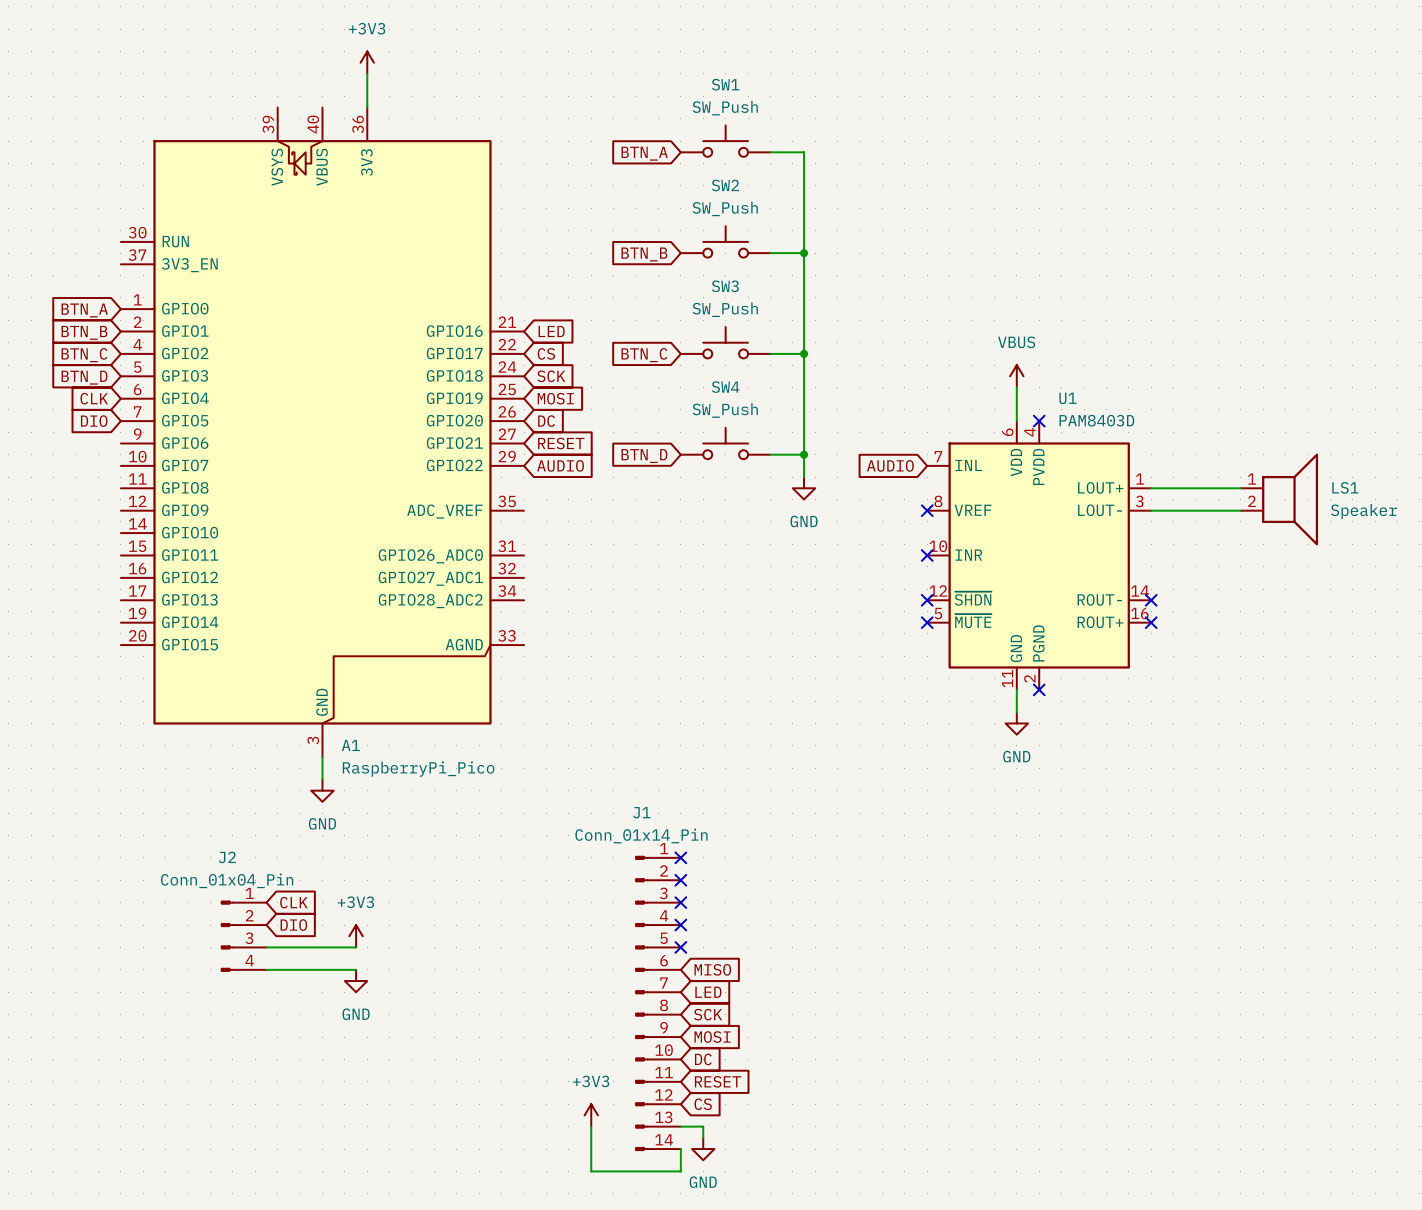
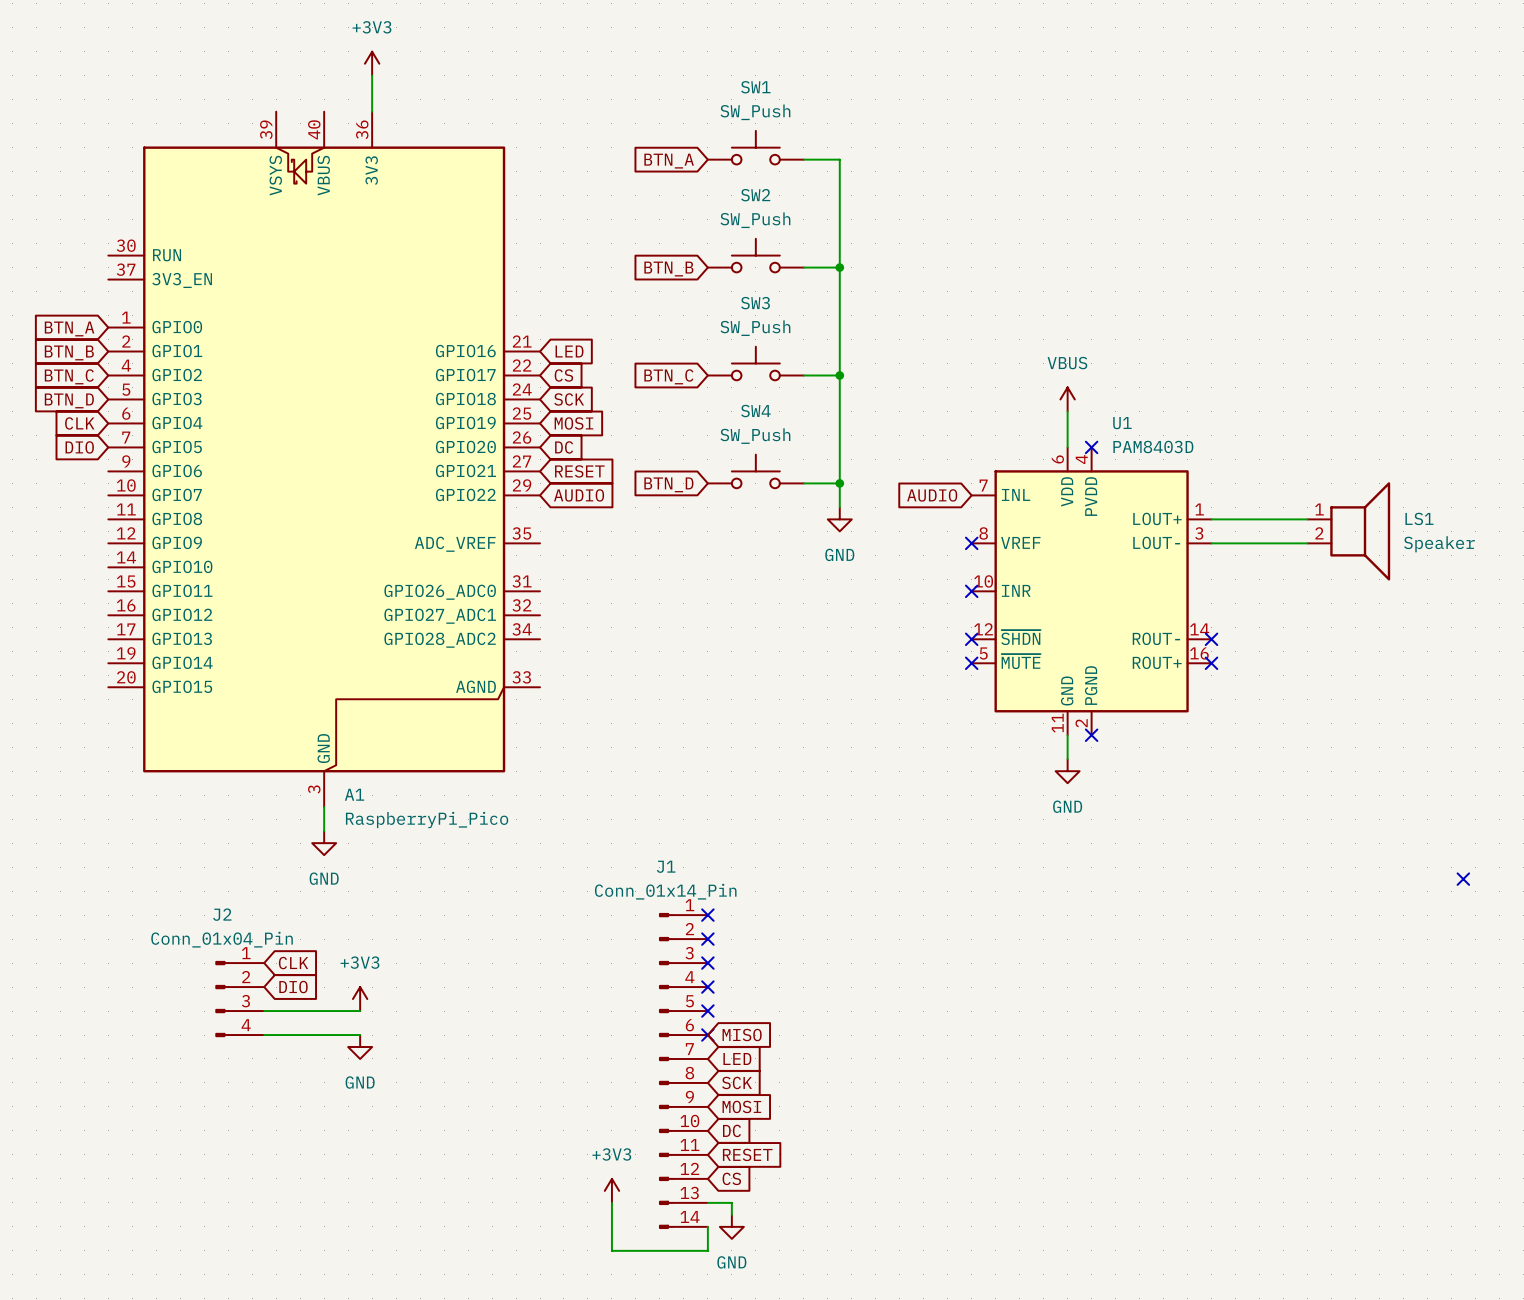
no-connect mark: none -> (1463, 879)
no-connect mark: none -> (707, 1035)

